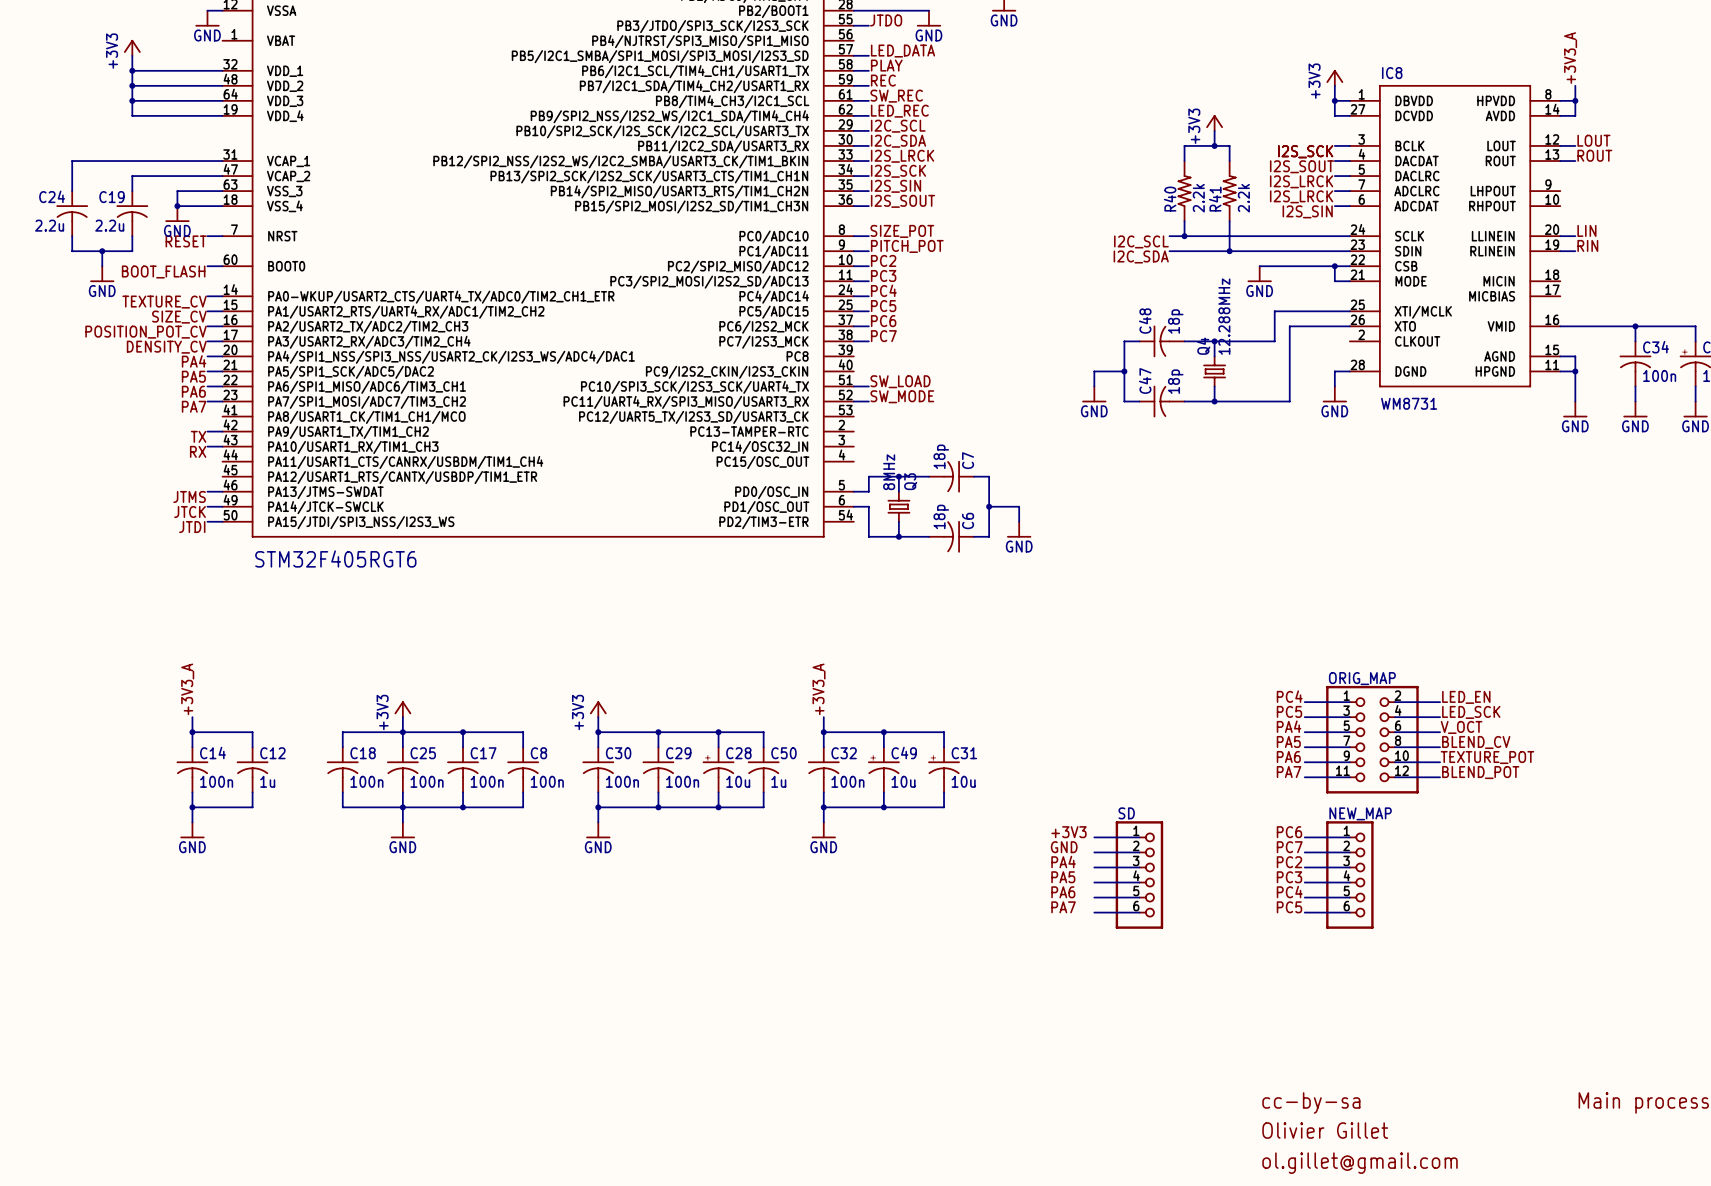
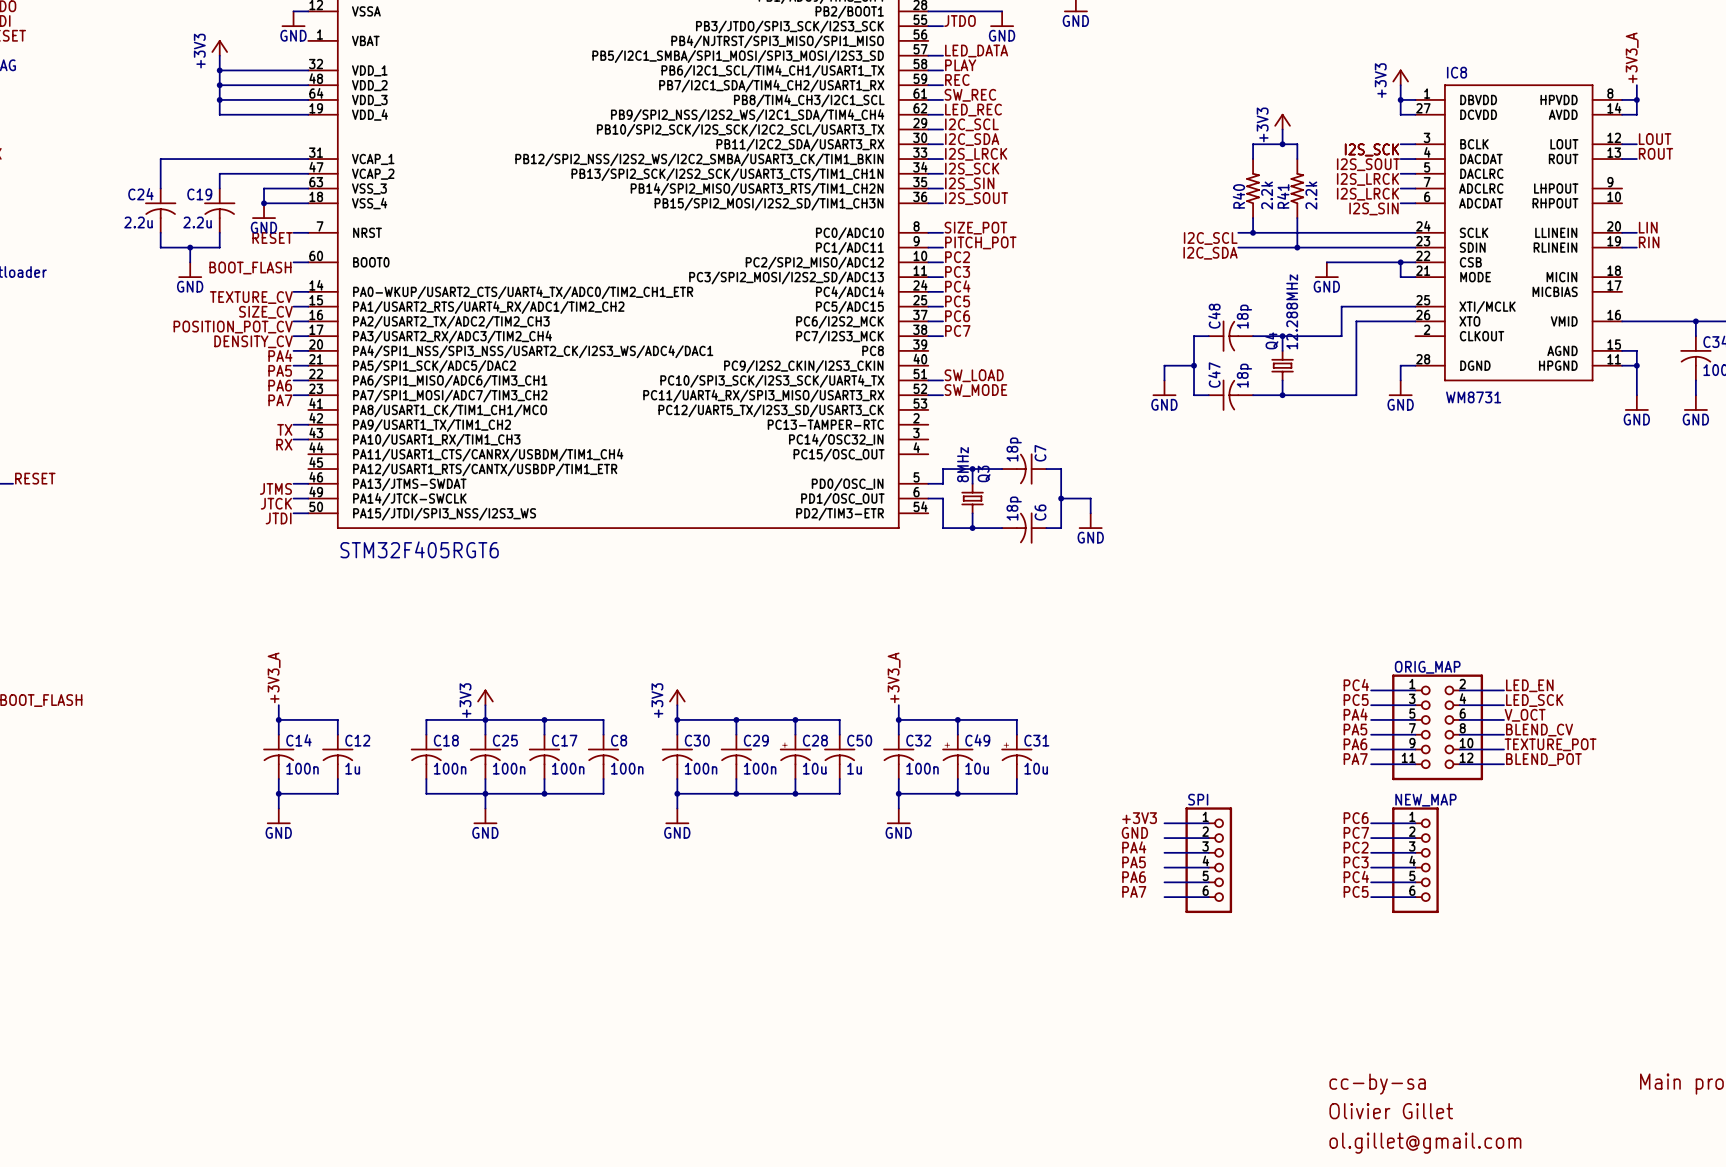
SD name: SD (1126, 813) -> SPI (1198, 799)

